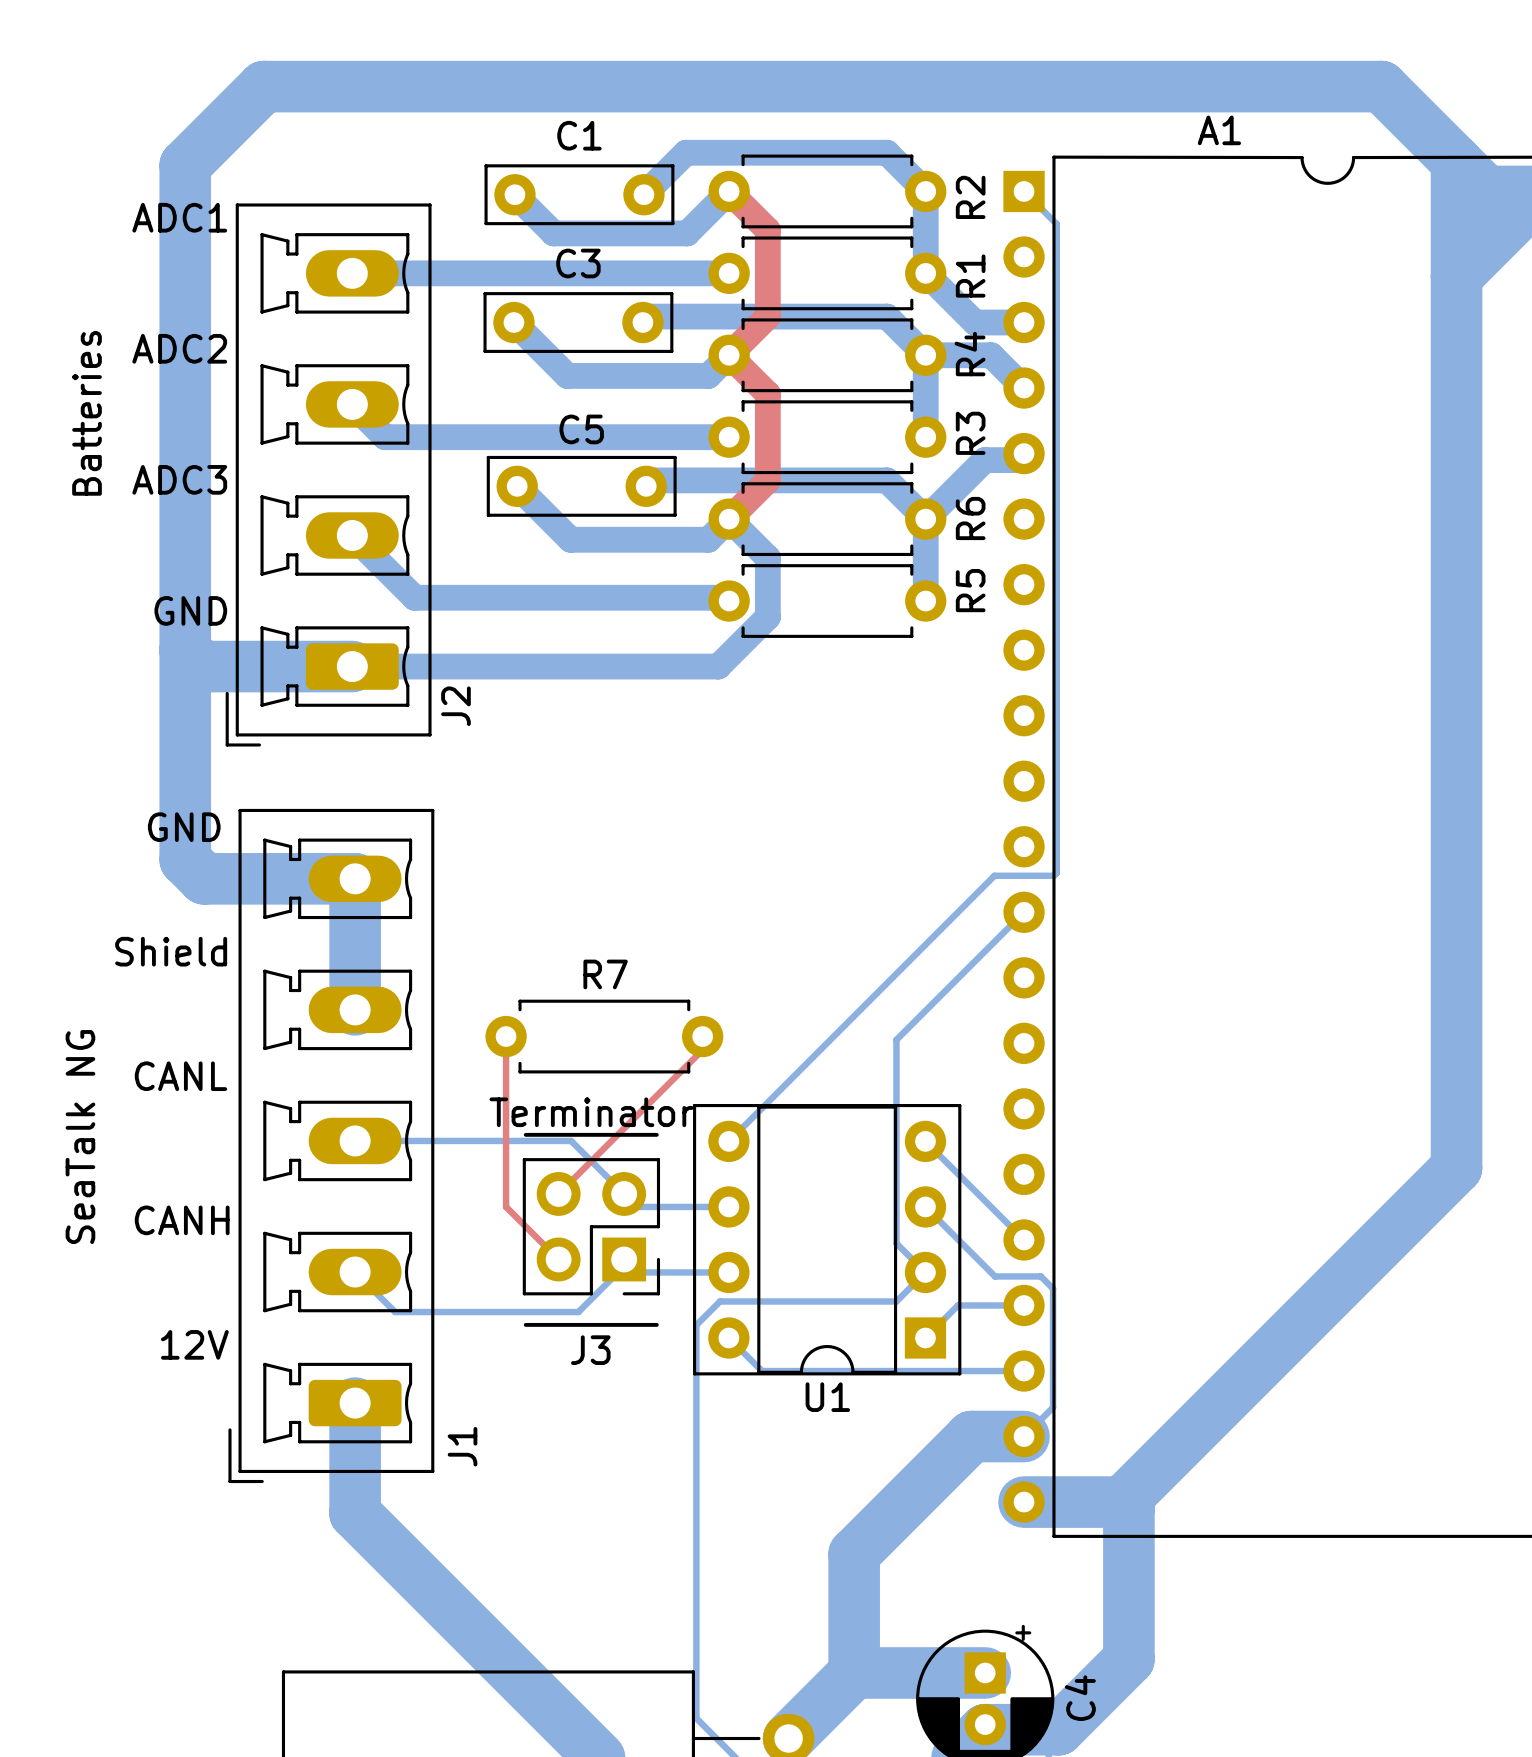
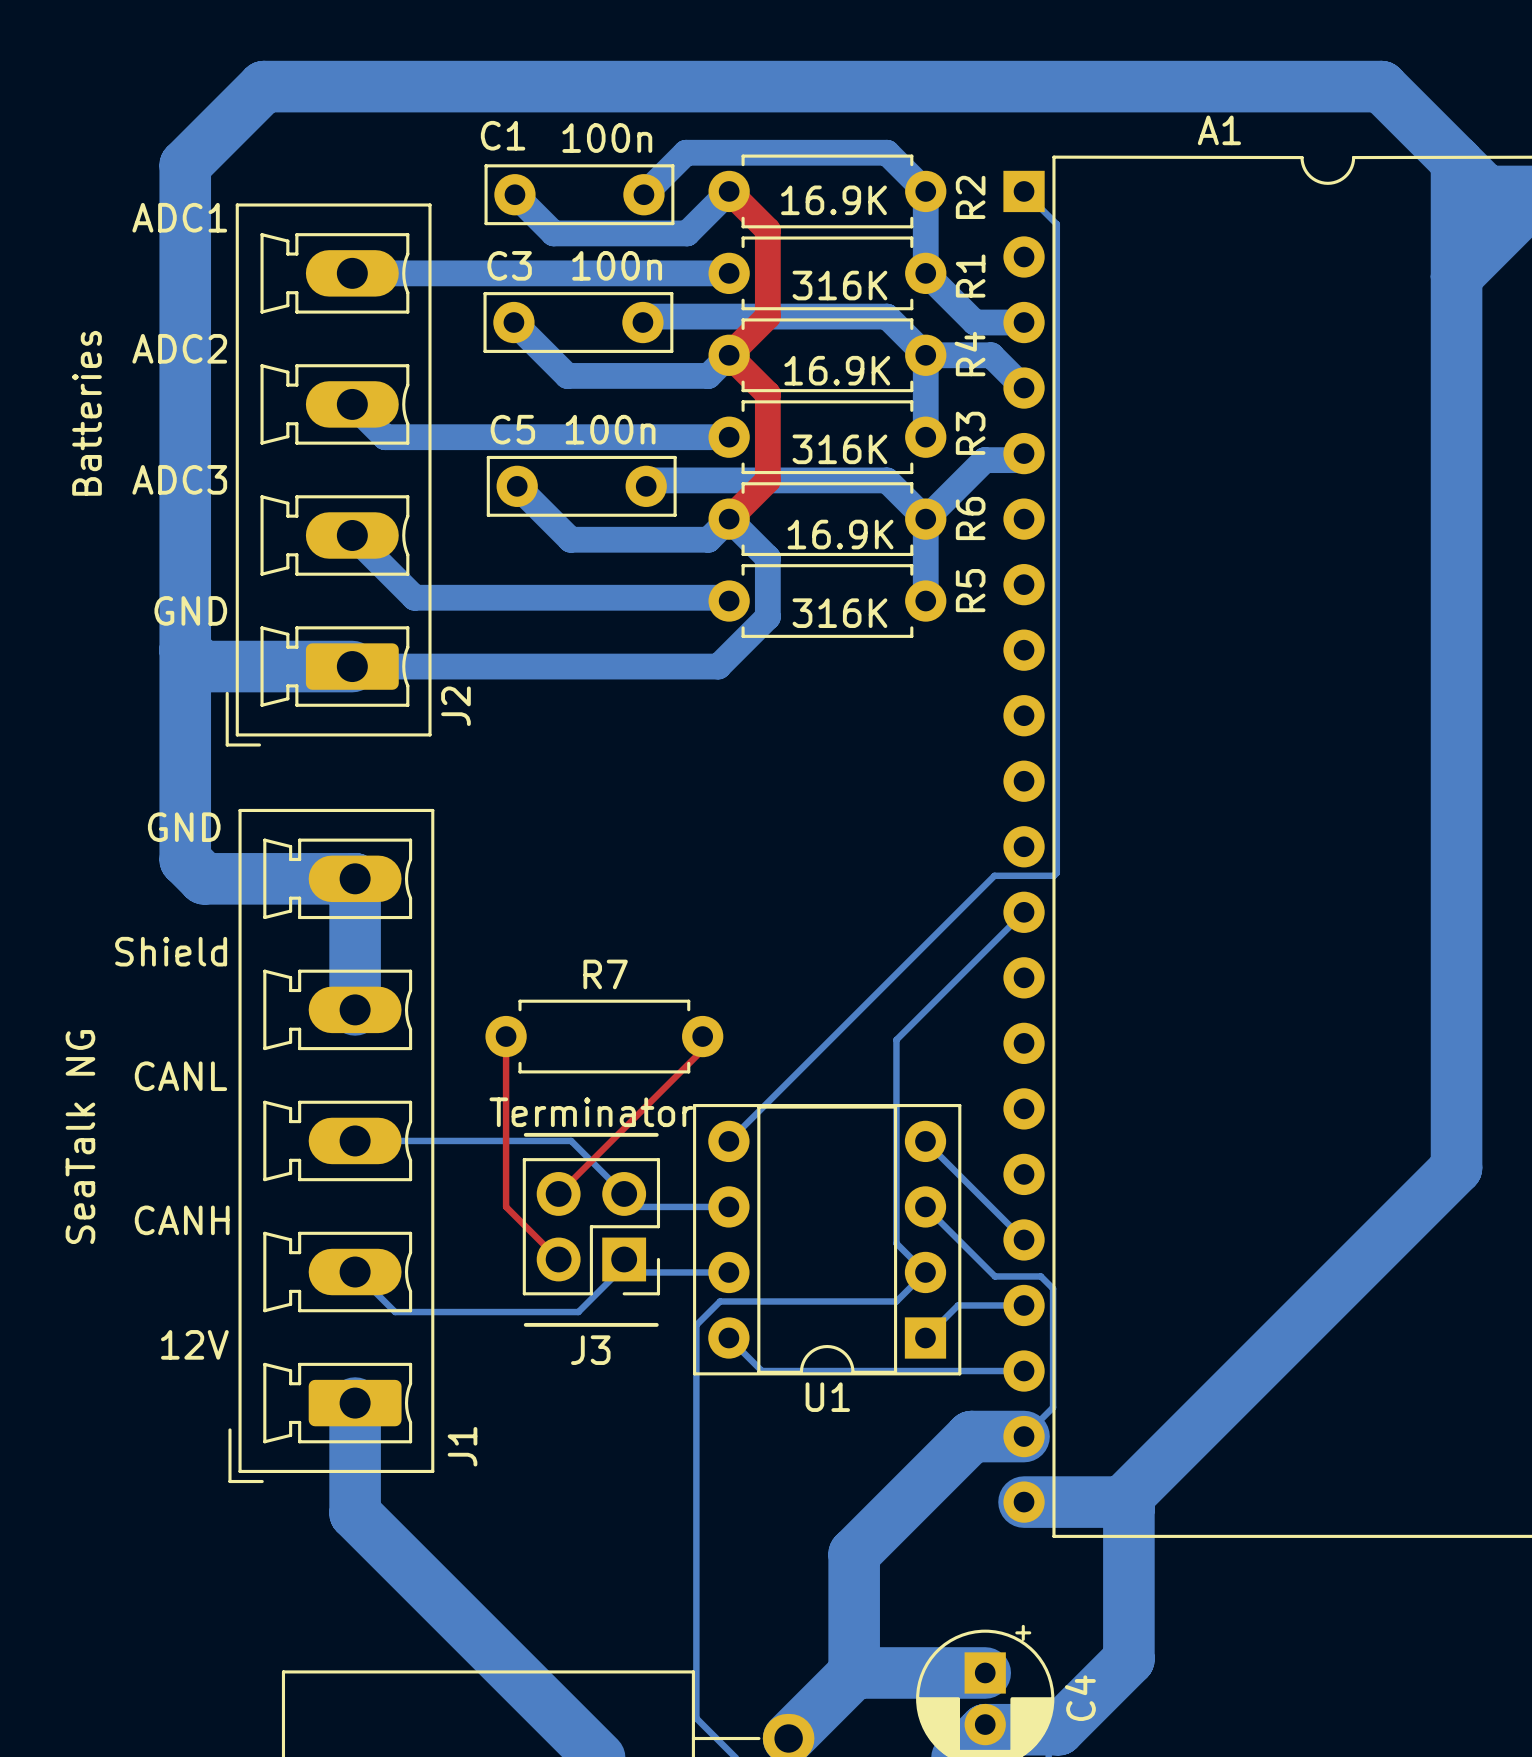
C1 name position: C1 (579, 135) -> C1 (503, 135)
C1 value: none -> 100n (607, 138)
R2 value: none -> 16.9K (834, 200)
C3 name position: C3 (578, 263) -> C3 (509, 265)
C3 value: none -> 100n (617, 265)
R1 value: none -> 316K (839, 285)
R4 value: none -> 16.9K (837, 370)
C5 name position: C5 (581, 429) -> C5 (512, 429)
C5 value: none -> 100n (610, 429)
R3 value: none -> 316K (839, 449)
R6 value: none -> 16.9K (840, 534)
R5 value: none -> 316K (839, 613)

